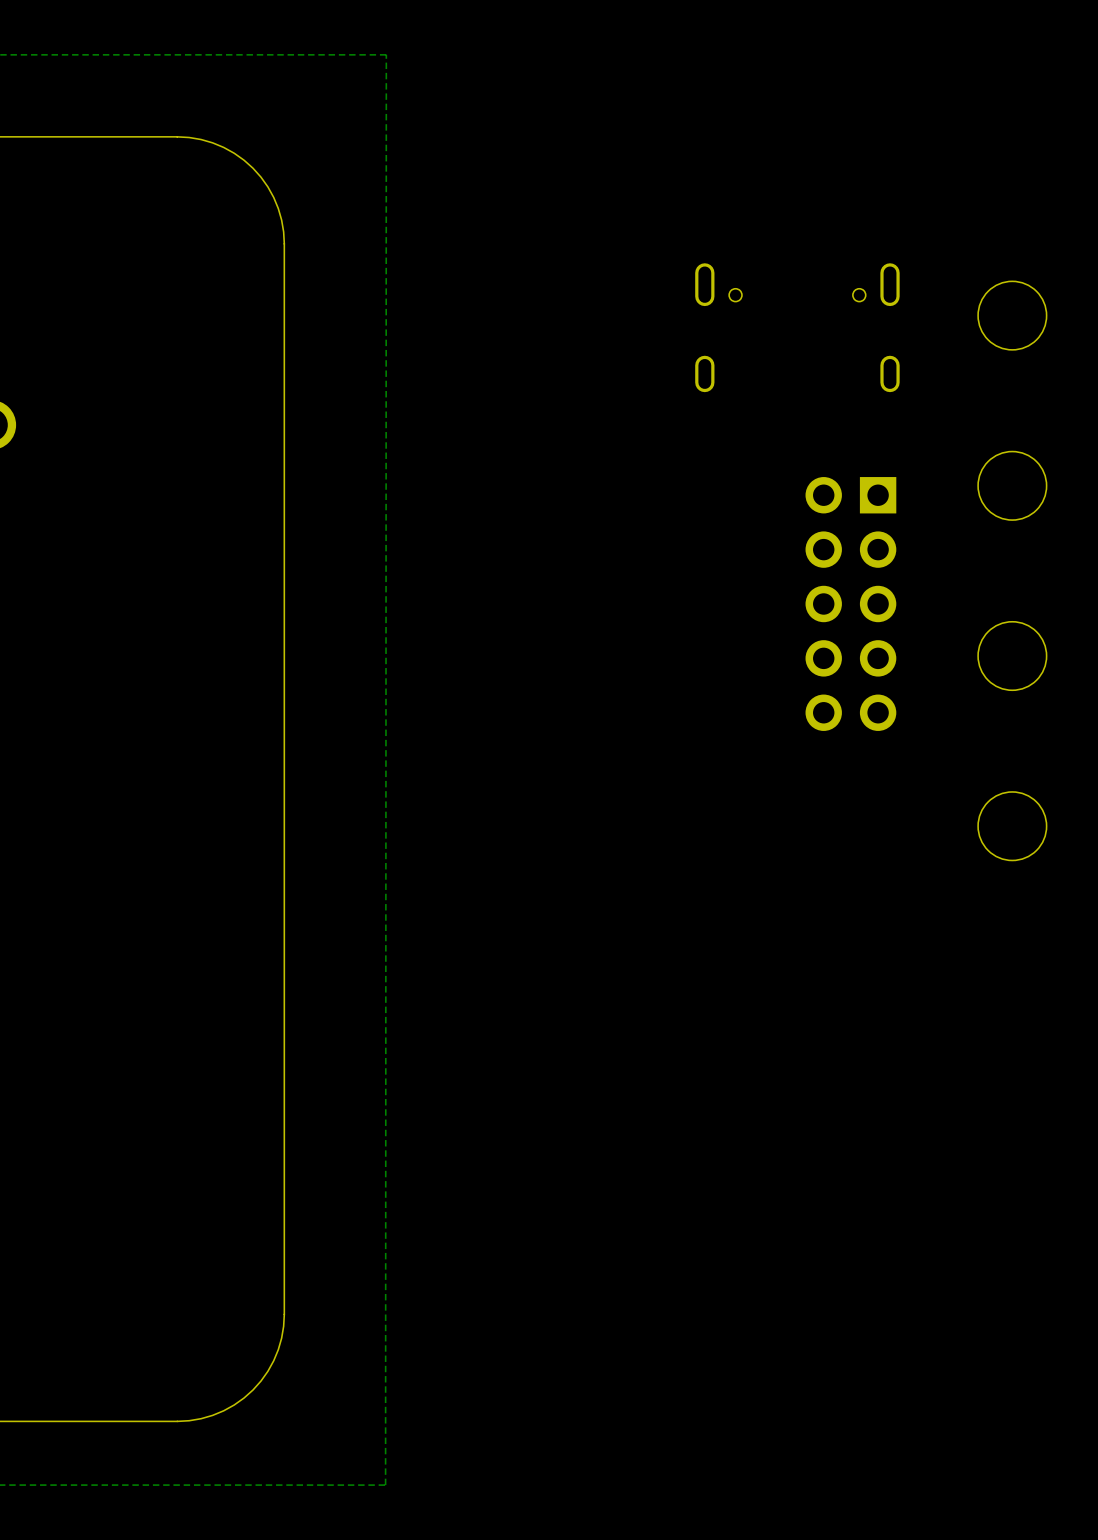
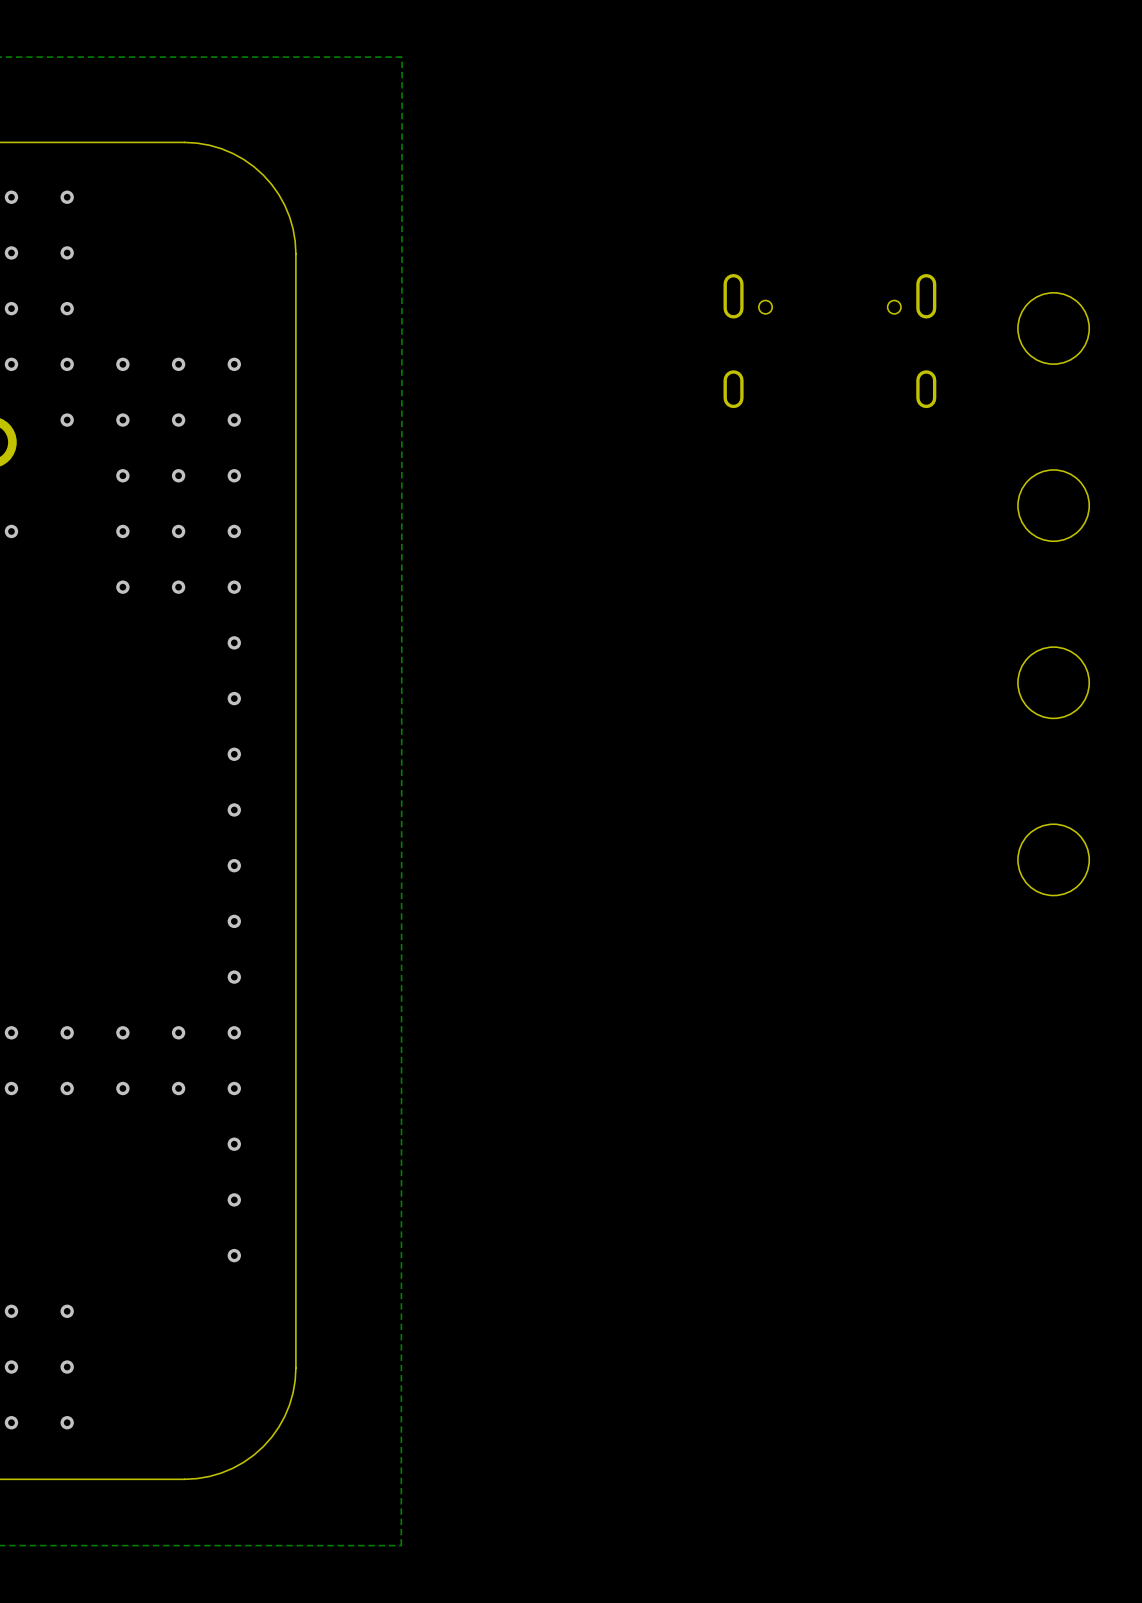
via: none -> (11, 197)
via: none -> (67, 197)
via: none -> (11, 252)
via: none -> (67, 252)
via: none -> (11, 308)
via: none -> (67, 308)
via: none -> (11, 364)
via: none -> (67, 364)
via: none -> (122, 364)
via: none -> (178, 364)
via: none -> (234, 364)
via: none -> (67, 420)
via: none -> (122, 420)
via: none -> (178, 420)
via: none -> (234, 420)
via: none -> (122, 475)
via: none -> (178, 475)
via: none -> (234, 475)
via: none -> (11, 531)
via: none -> (122, 531)
via: none -> (178, 531)
via: none -> (234, 531)
via: none -> (122, 587)
via: none -> (178, 587)
via: none -> (234, 587)
part: (850, 603) -> none
via: none -> (234, 642)
via: none -> (234, 698)
via: none -> (234, 754)
via: none -> (234, 809)
via: none -> (234, 865)
via: none -> (234, 921)
via: none -> (234, 977)
via: none -> (11, 1032)
via: none -> (67, 1032)
via: none -> (122, 1032)
via: none -> (178, 1032)
via: none -> (234, 1032)
via: none -> (11, 1088)
via: none -> (67, 1088)
via: none -> (122, 1088)
via: none -> (178, 1088)
via: none -> (234, 1088)
via: none -> (234, 1144)
via: none -> (234, 1199)
via: none -> (234, 1255)
via: none -> (11, 1311)
via: none -> (67, 1311)
via: none -> (11, 1367)
via: none -> (67, 1367)
via: none -> (11, 1422)
via: none -> (67, 1422)

